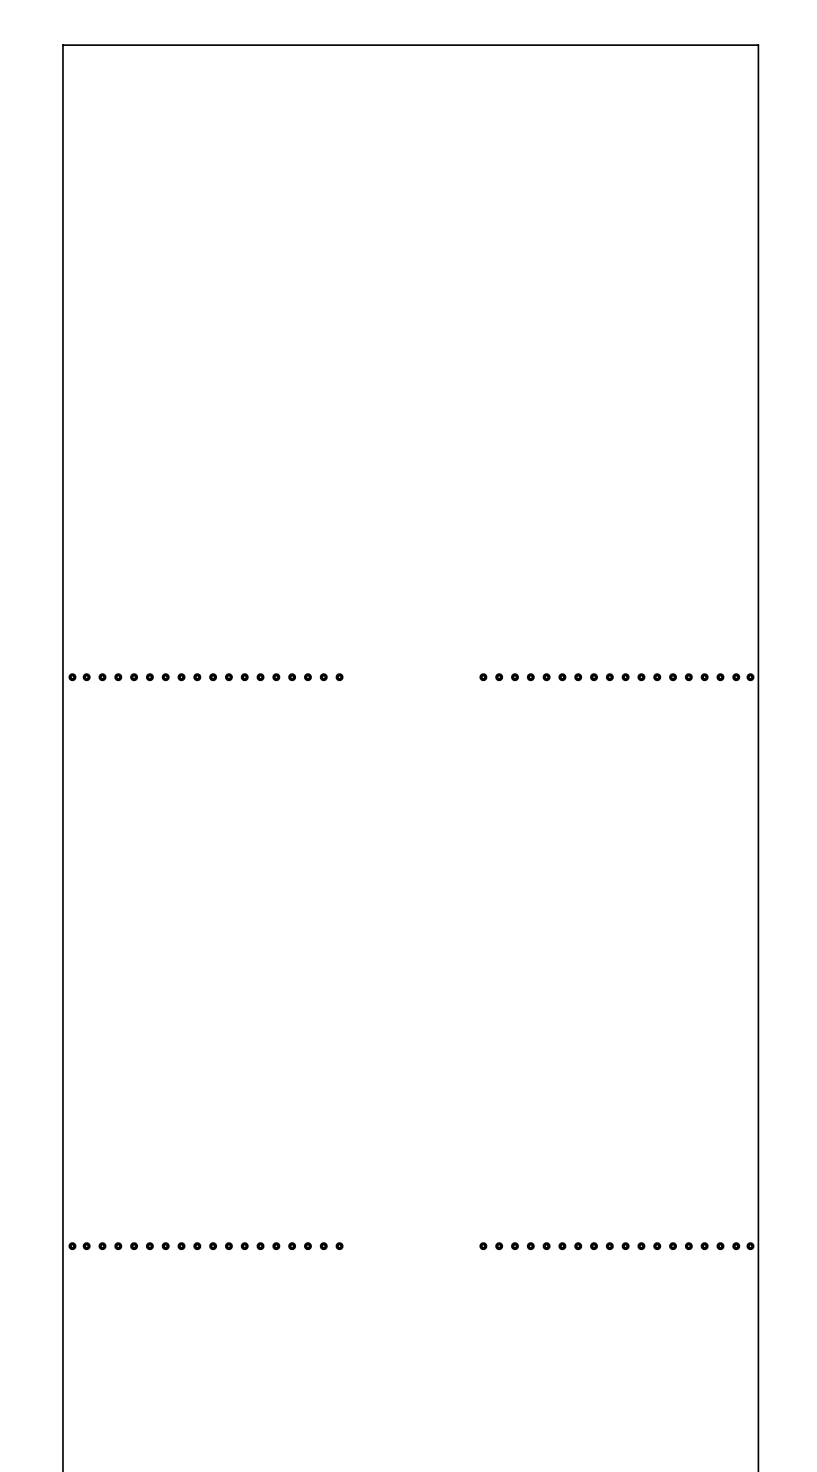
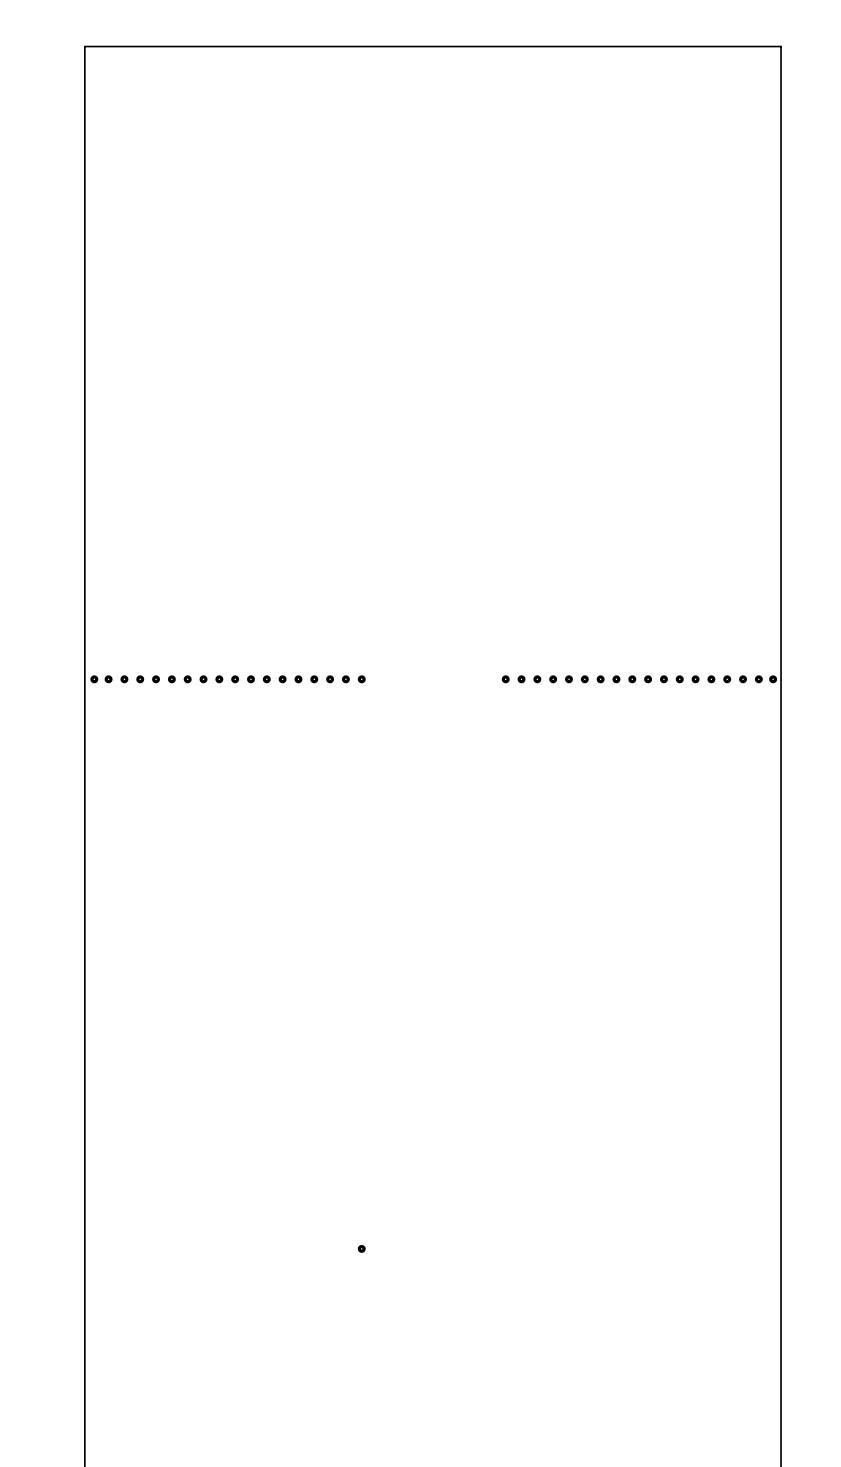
round board edge: [68, 1242, 77, 1251] -> none
round board edge: [82, 1242, 91, 1251] -> none
round board edge: [98, 1242, 107, 1251] -> none
round board edge: [114, 1242, 123, 1251] -> none
round board edge: [130, 1242, 139, 1251] -> none
round board edge: [145, 1242, 154, 1251] -> none
round board edge: [161, 1242, 170, 1251] -> none
round board edge: [177, 1242, 186, 1251] -> none
round board edge: [193, 1242, 202, 1251] -> none
round board edge: [209, 1242, 218, 1251] -> none
round board edge: [224, 1242, 233, 1251] -> none
round board edge: [240, 1242, 249, 1251] -> none
round board edge: [256, 1242, 265, 1251] -> none
round board edge: [272, 1242, 281, 1251] -> none
round board edge: [288, 1242, 297, 1251] -> none
round board edge: [304, 1242, 312, 1251] -> none
round board edge: [319, 1242, 328, 1251] -> none
round board edge: [479, 1242, 488, 1251] -> none
round board edge: [495, 1242, 504, 1251] -> none
round board edge: [511, 1242, 519, 1251] -> none
round board edge: [526, 1242, 535, 1251] -> none
round board edge: [542, 1242, 551, 1251] -> none
round board edge: [558, 1242, 567, 1251] -> none
round board edge: [574, 1242, 583, 1251] -> none
round board edge: [590, 1242, 598, 1251] -> none
round board edge: [605, 1242, 614, 1251] -> none
round board edge: [621, 1242, 630, 1251] -> none
round board edge: [637, 1242, 646, 1251] -> none
round board edge: [653, 1242, 662, 1251] -> none
round board edge: [669, 1242, 677, 1251] -> none
round board edge: [684, 1242, 693, 1251] -> none
round board edge: [700, 1242, 709, 1251] -> none
round board edge: [716, 1242, 725, 1251] -> none
round board edge: [732, 1242, 741, 1251] -> none
round board edge: [746, 1242, 755, 1251] -> none

